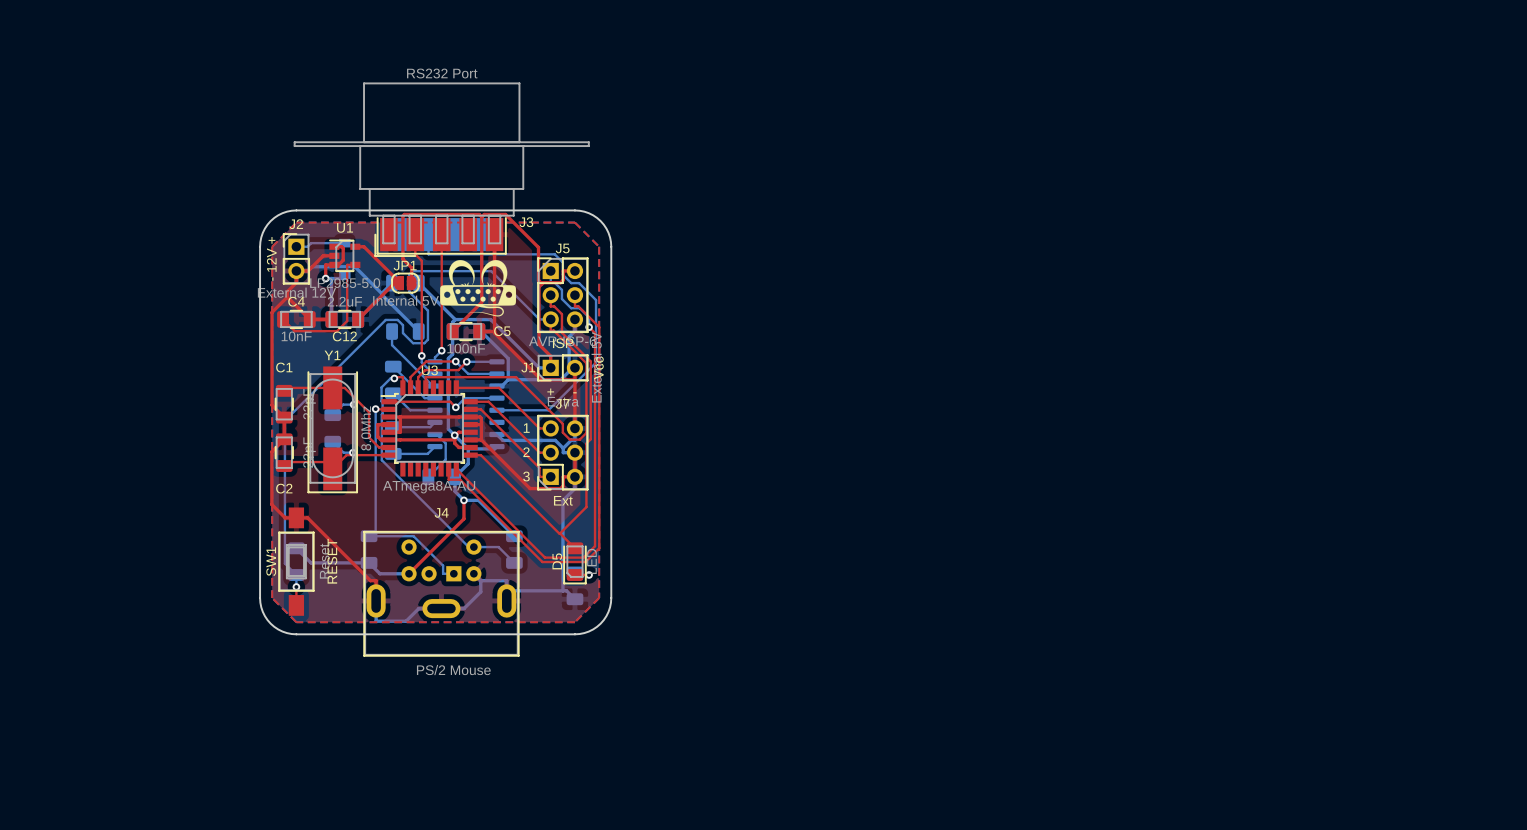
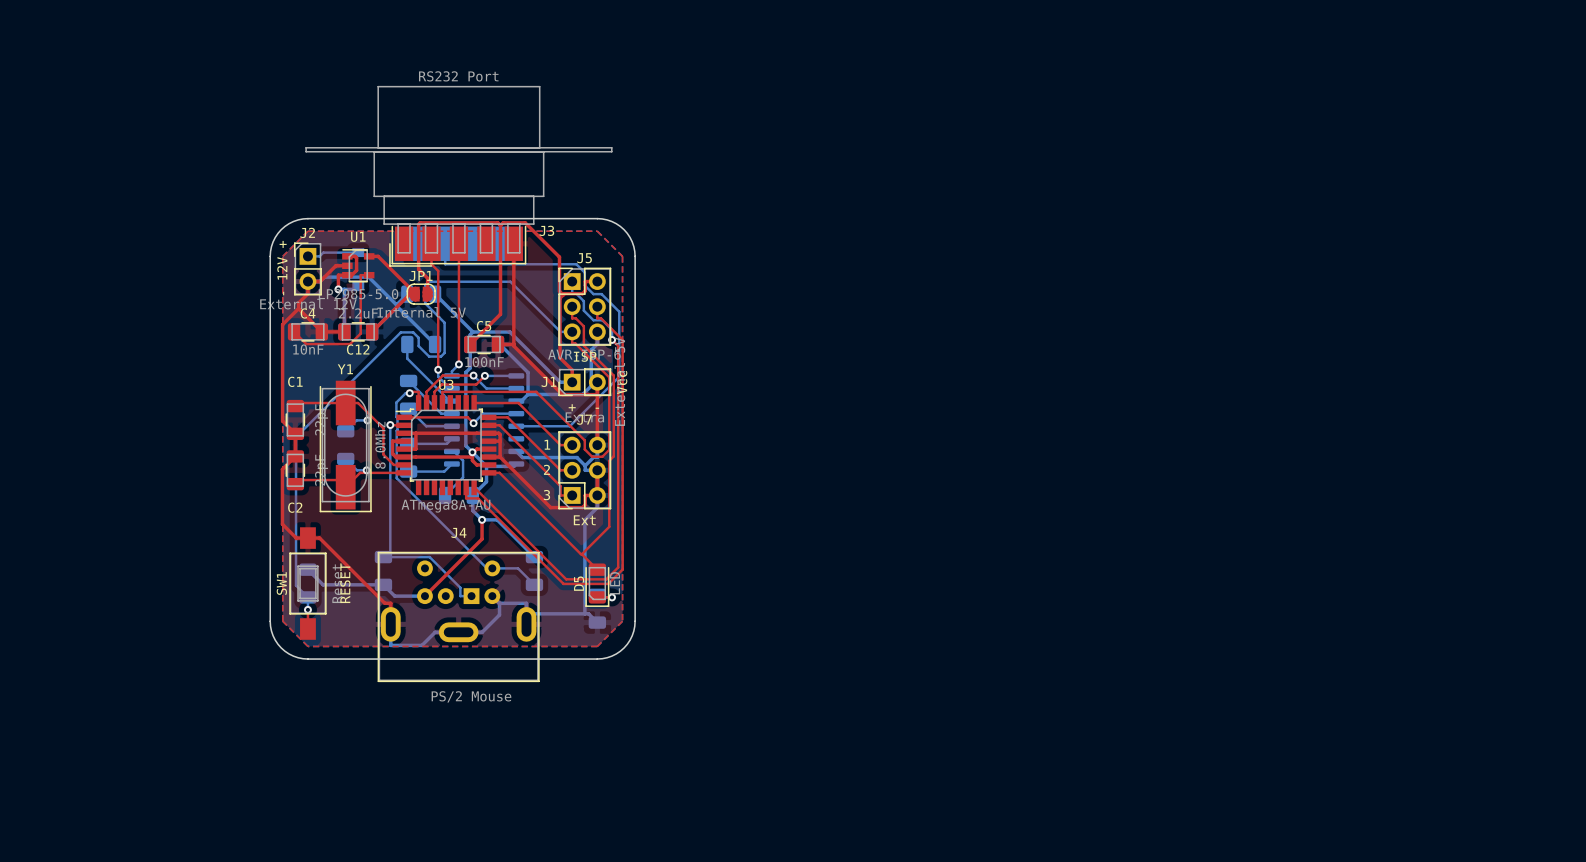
drawing: [440, 260, 517, 317] -> none
C5 name position: C5 (502, 331) -> C5 (484, 326)

